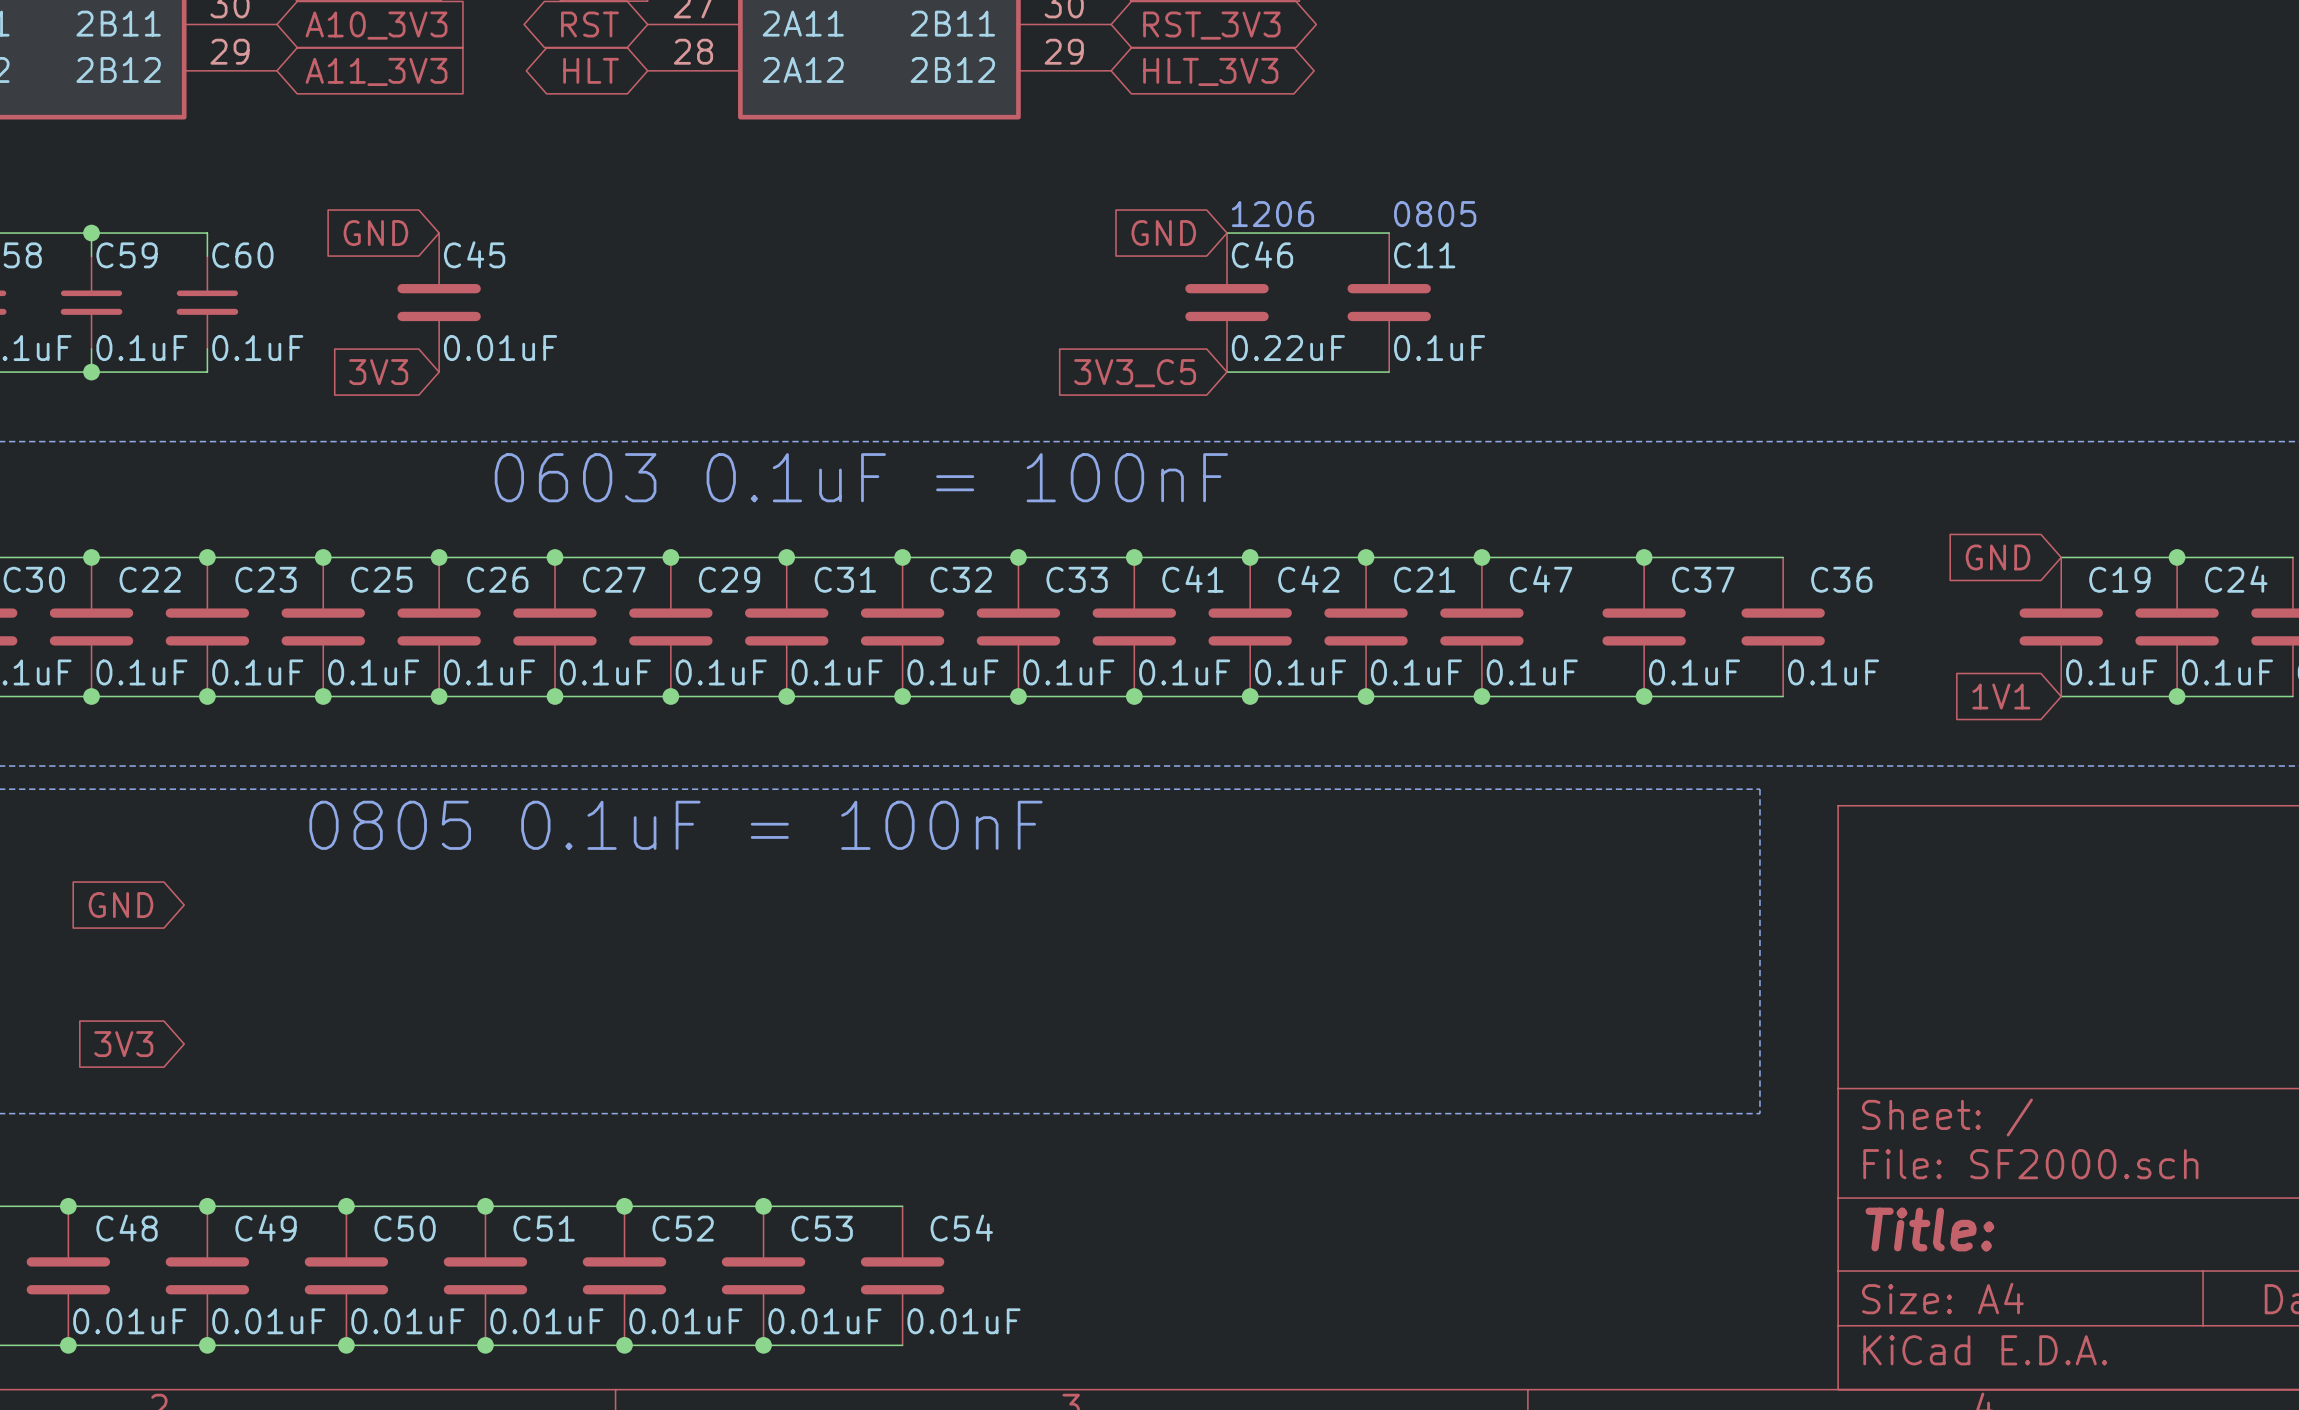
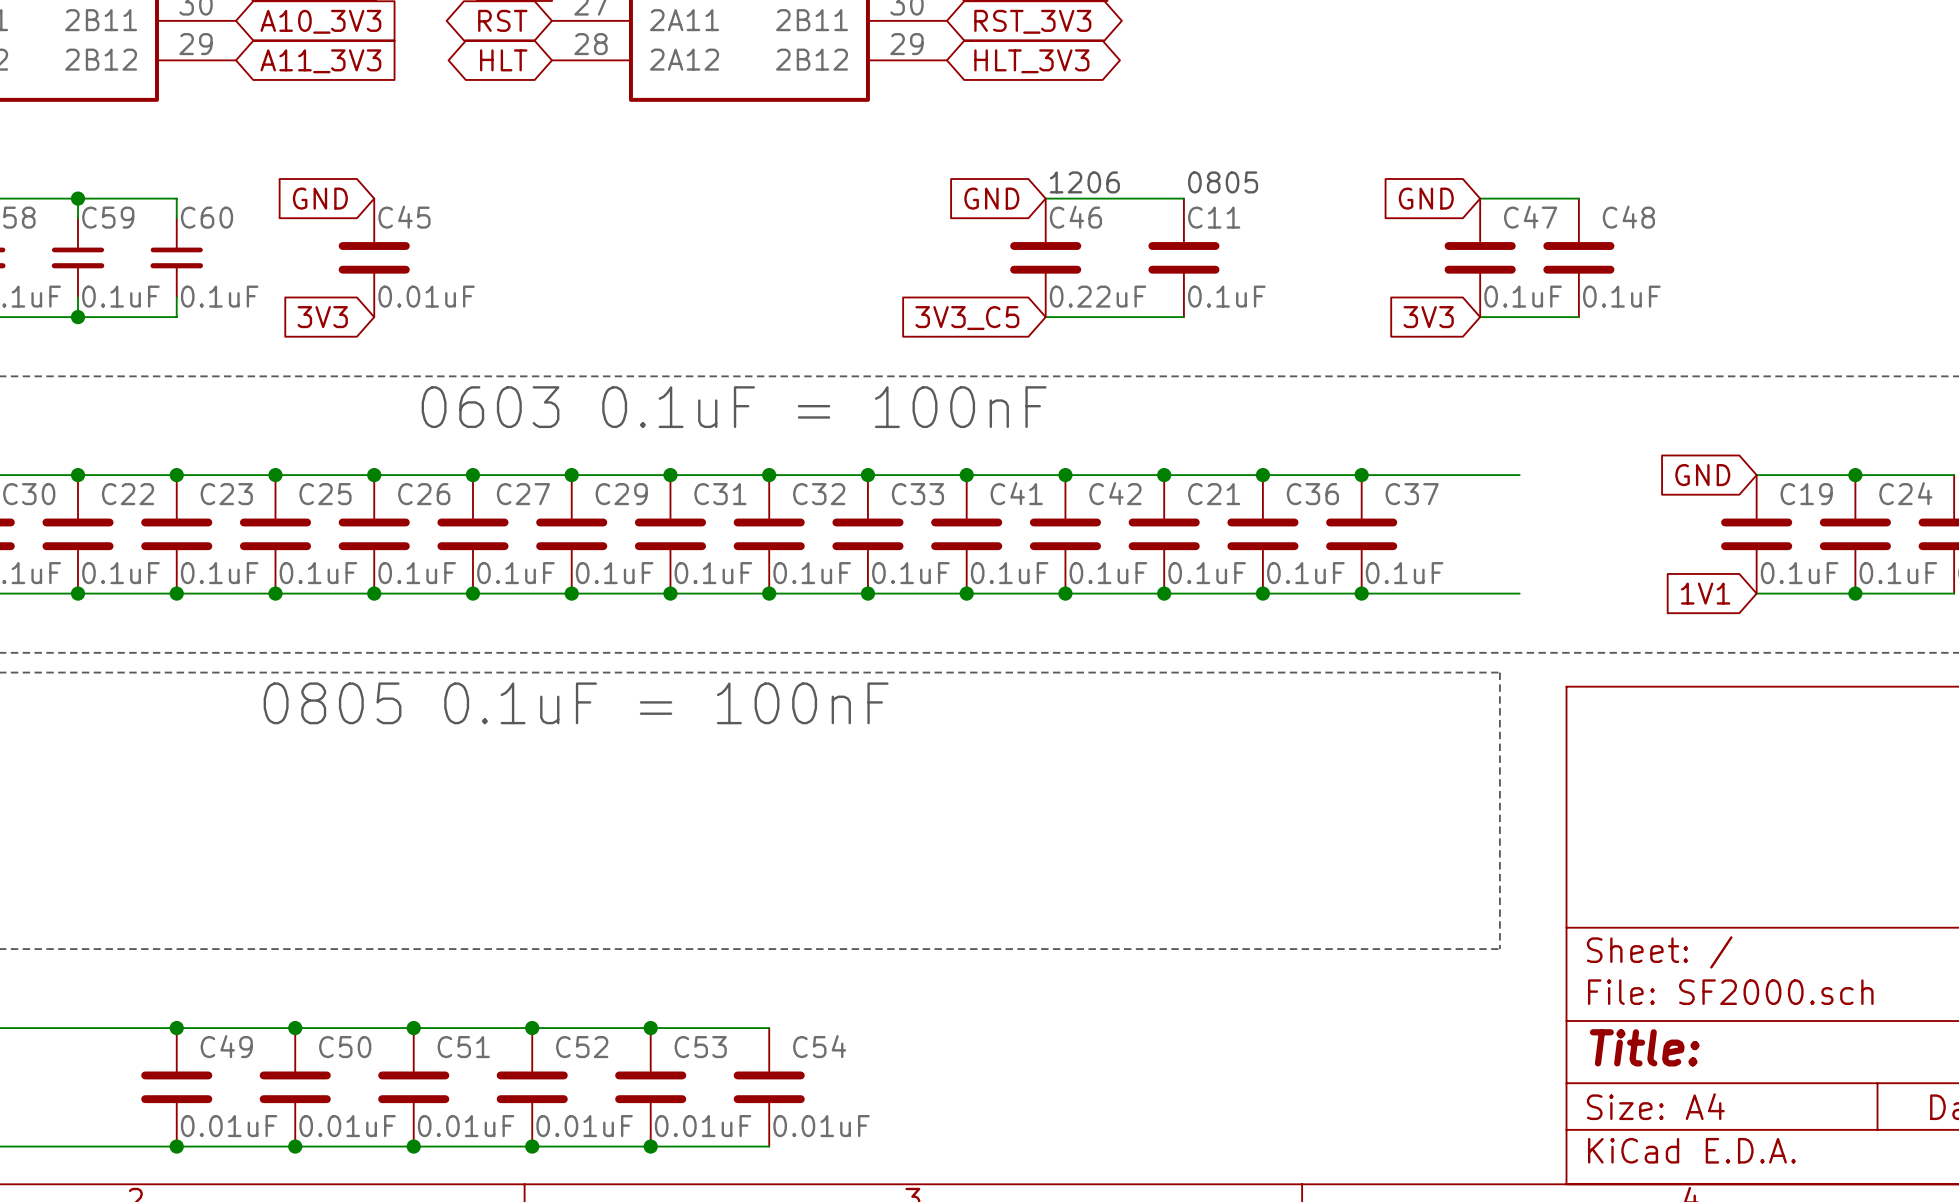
global label: none -> GND (1426, 198)
wire: none -> (1480, 198) (1578, 198)
C47: none -> 0.1uF (1480, 257)
global label: none -> 3V3 (1428, 317)
wire: none -> (1480, 317) (1578, 317)
junction position: (1644, 557) -> (1361, 475)
C47 name: C47 (1541, 579) -> C36 (1312, 494)
C37 position: (1644, 626) -> (1361, 534)
C36: 0.1uF (1783, 626) -> none
junction position: (1644, 696) -> (1361, 593)
global label: GND (121, 905) -> none
global label: 3V3 (123, 1044) -> none
junction: (68, 1206) -> none
C48 position: (68, 1275) -> (1578, 257)
C48 value: 0.01uF (129, 1321) -> 0.1uF (1621, 296)
junction: (68, 1345) -> none

